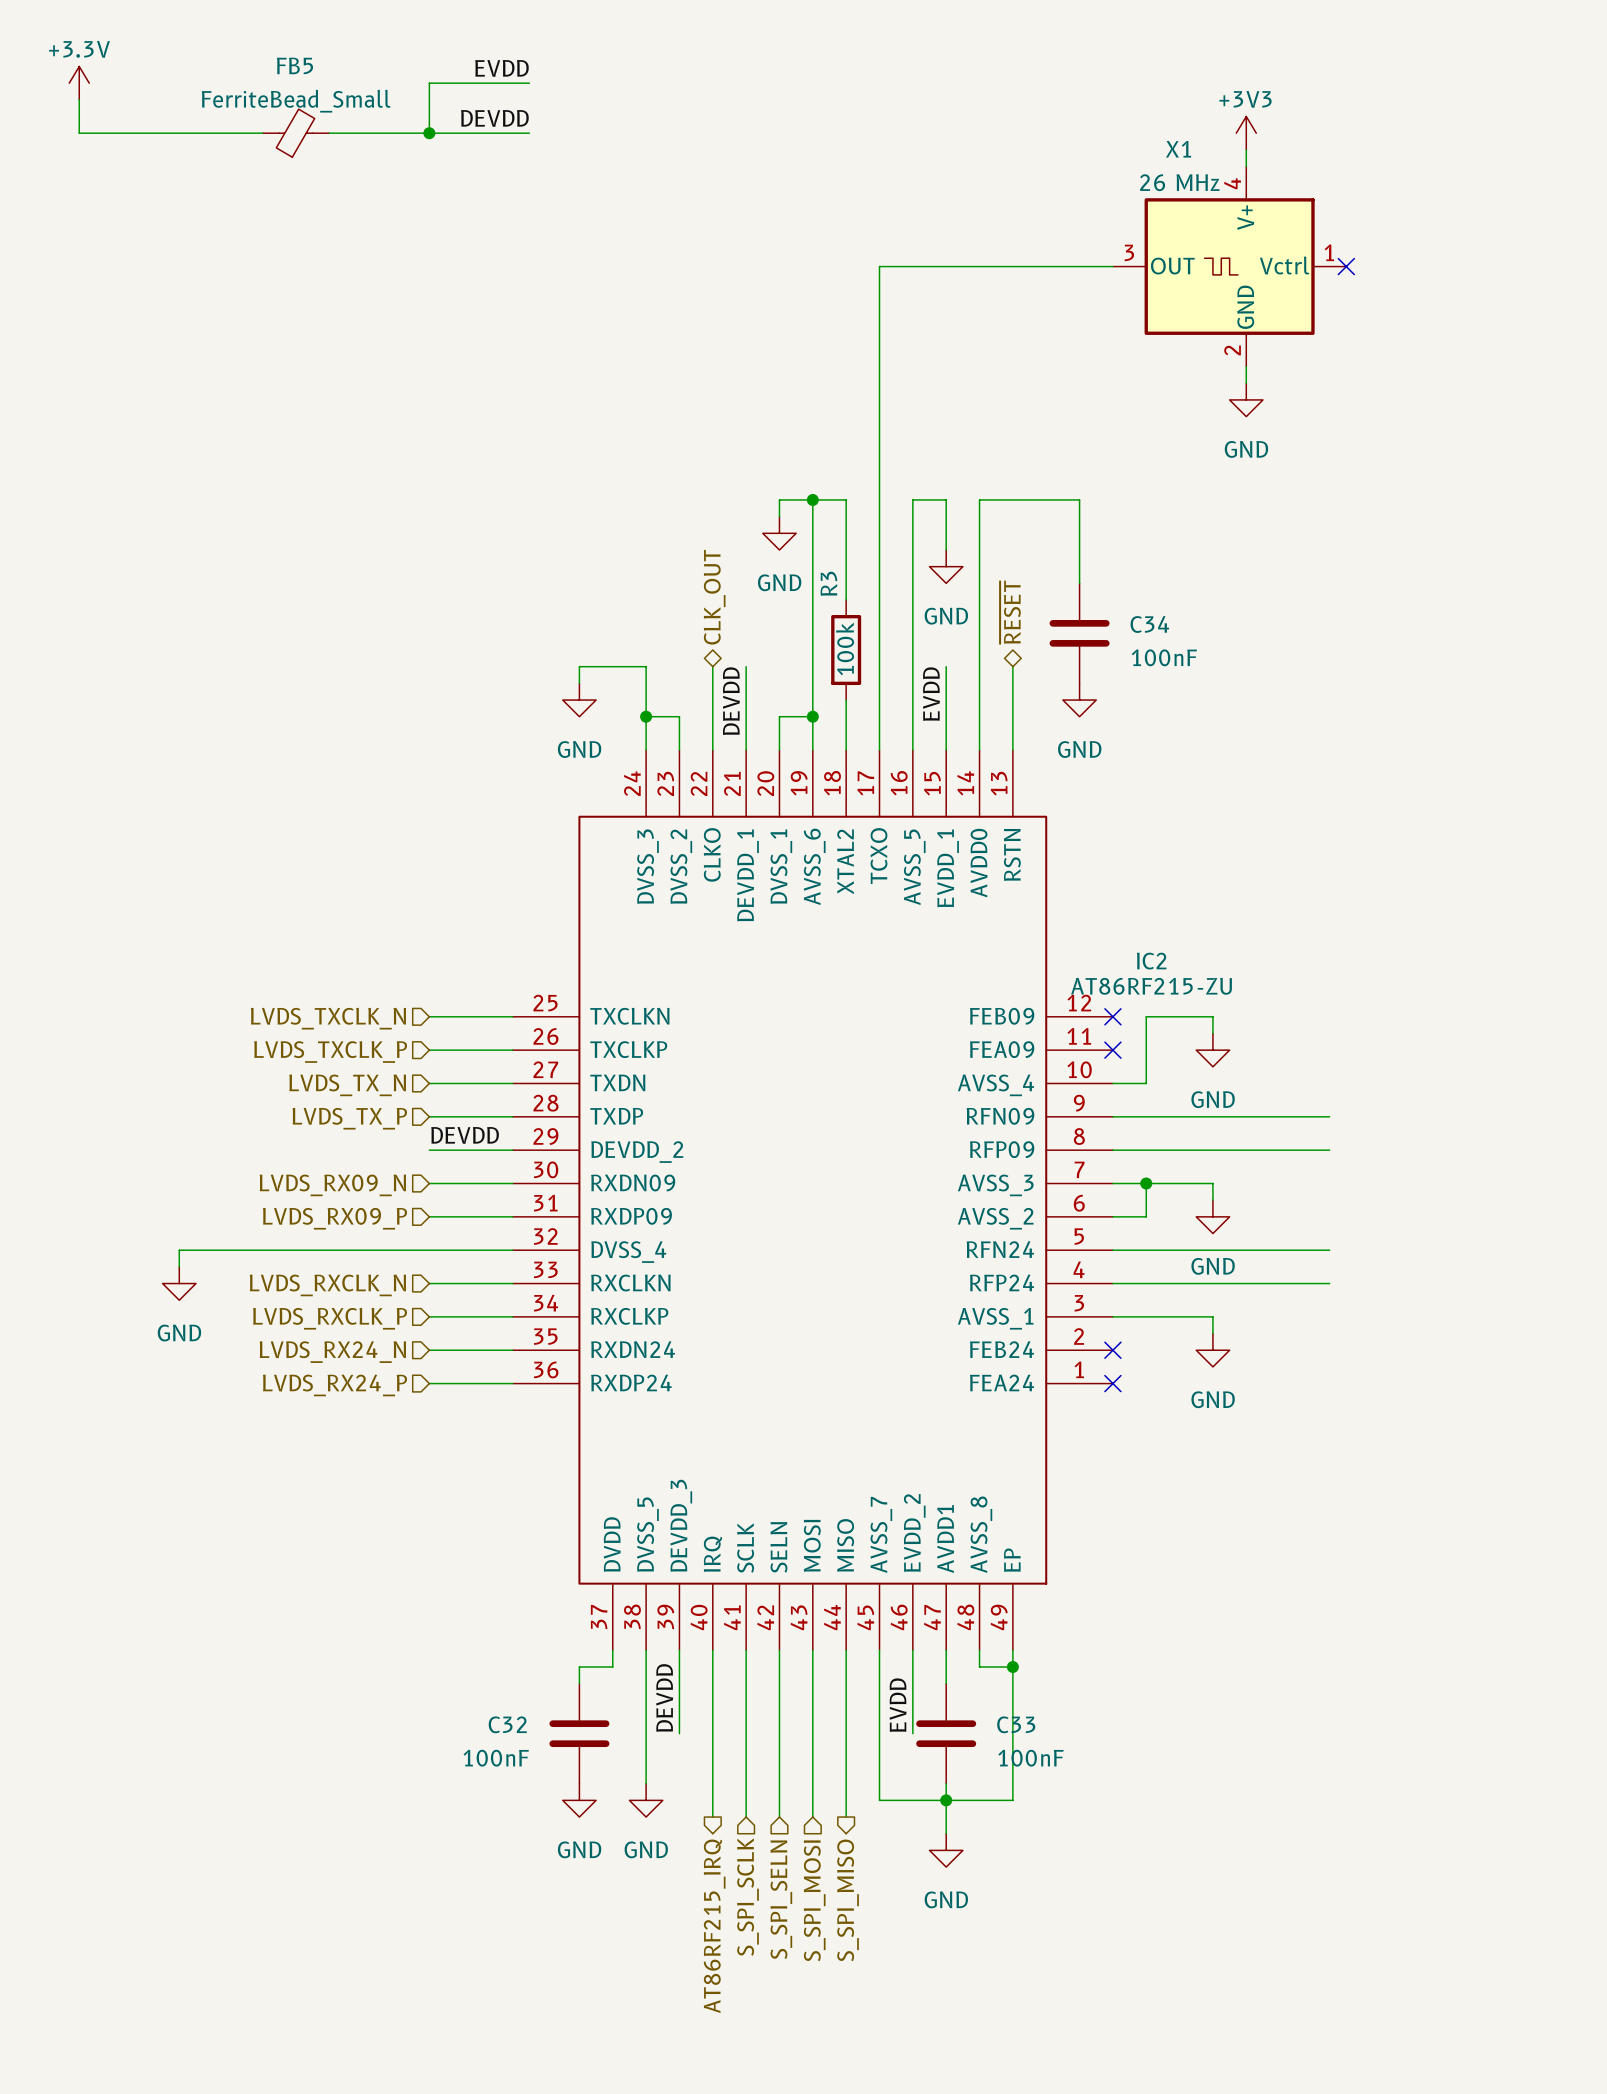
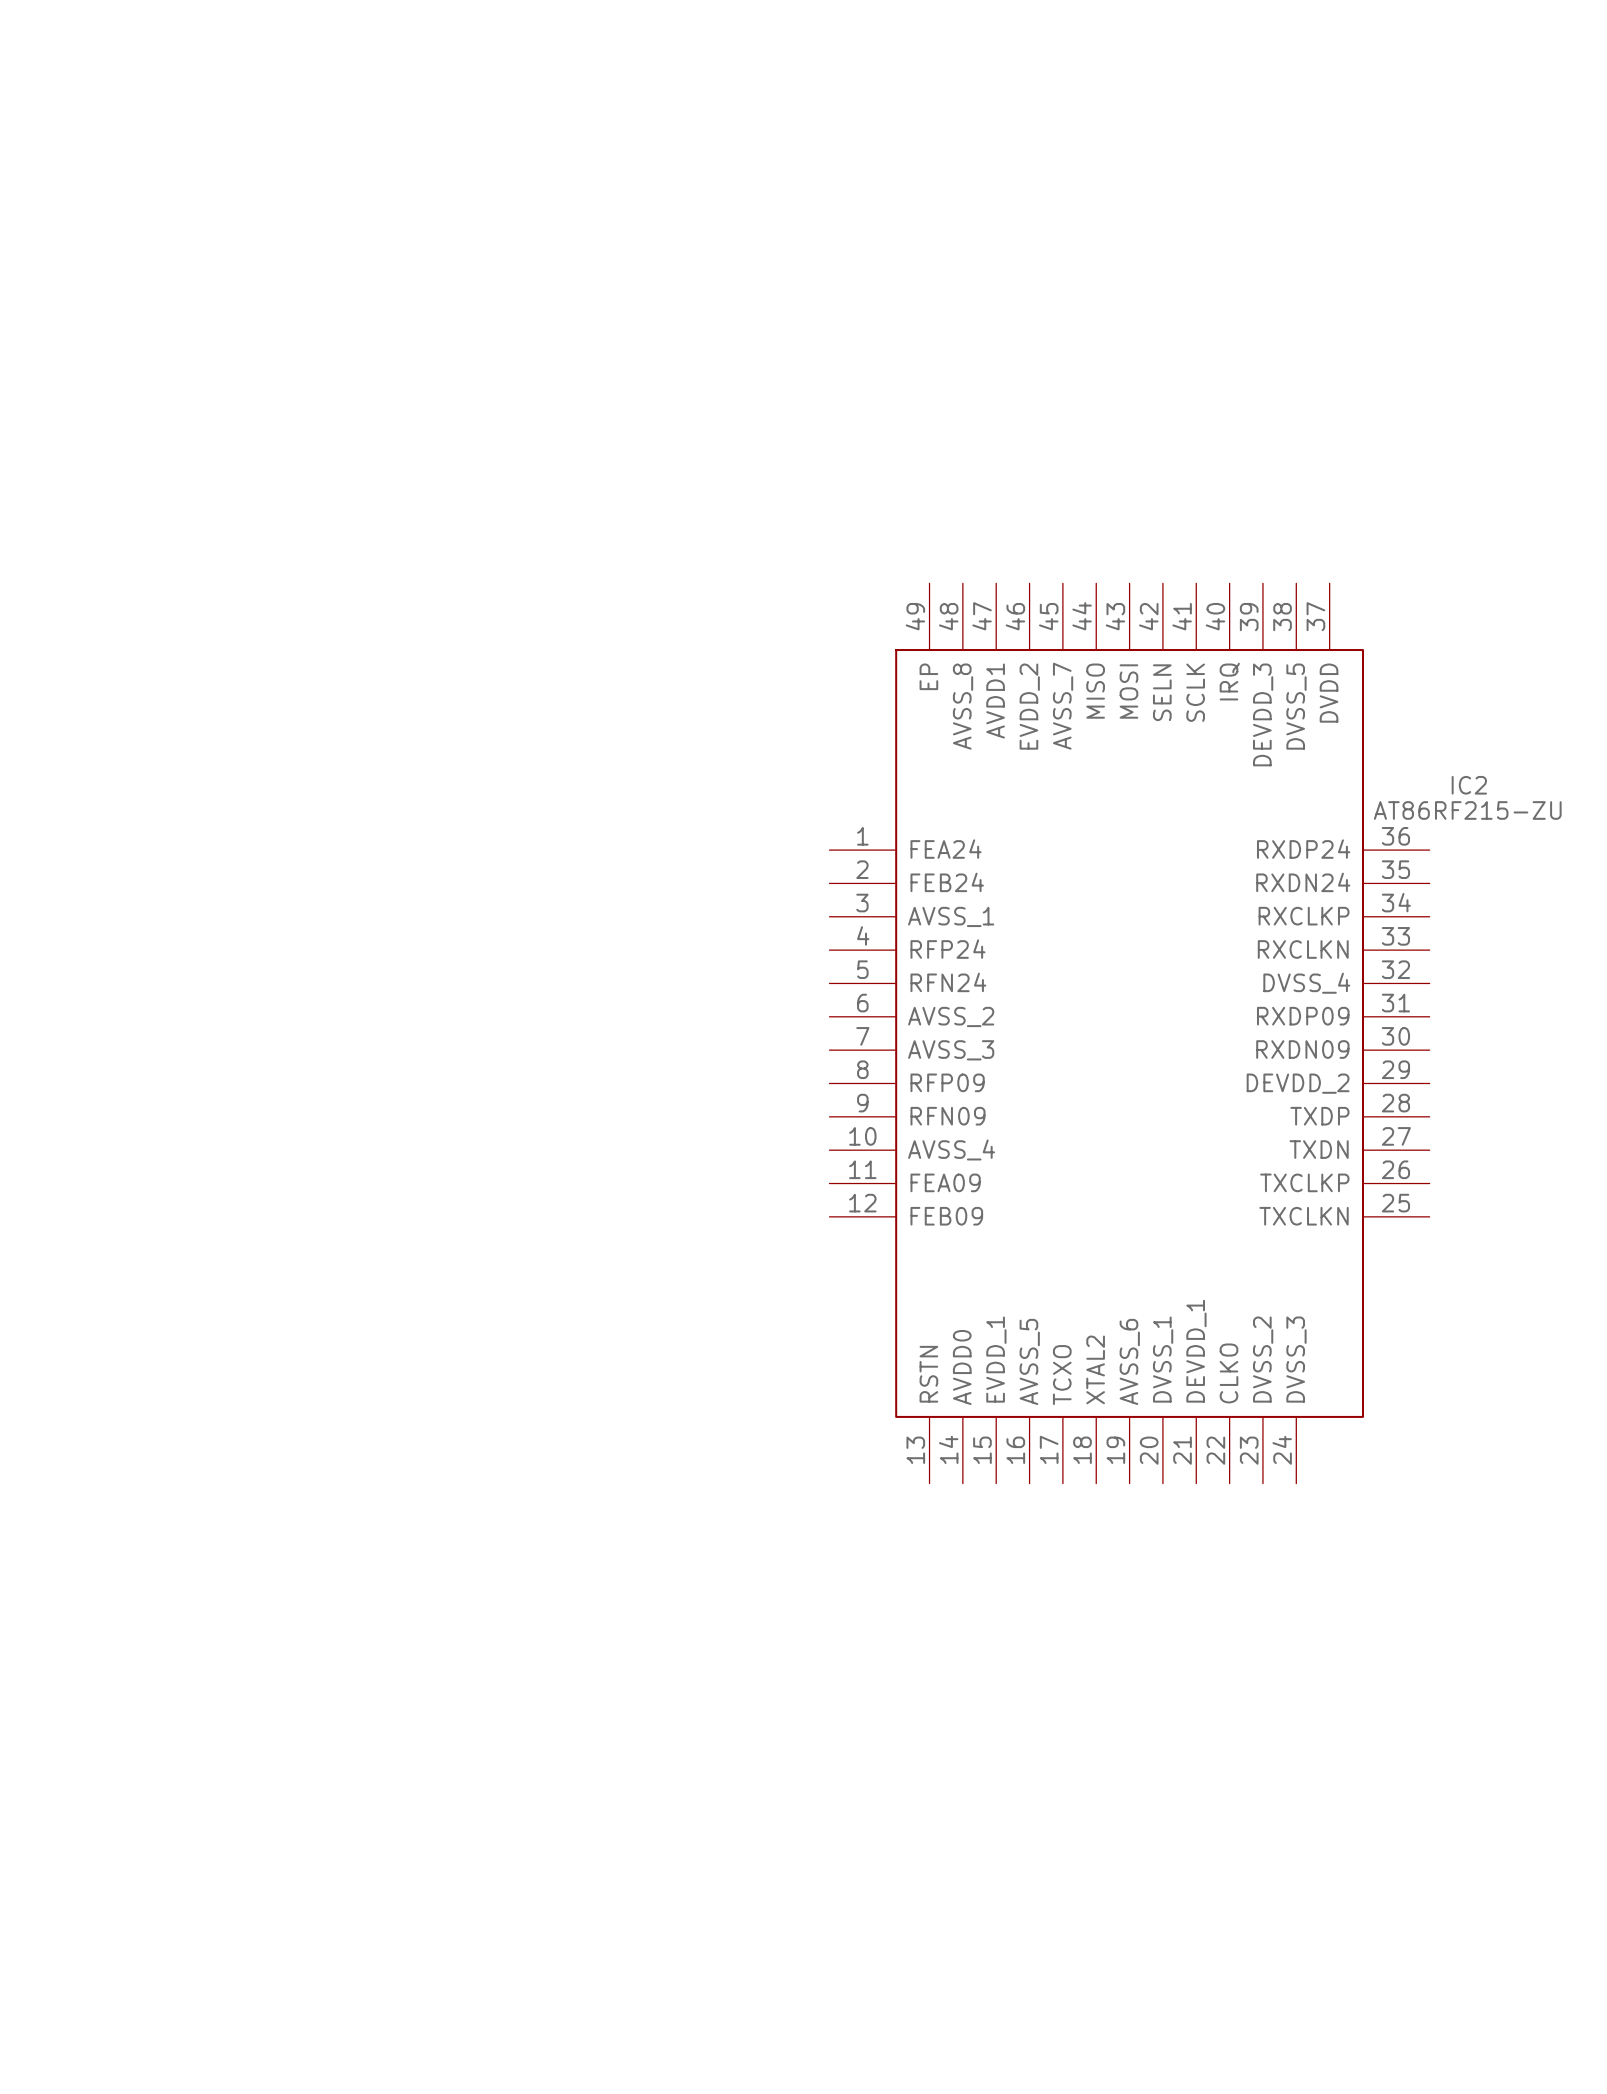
label: EVDD (501, 68) -> none
power symbol: +3.3V (79, 83) -> none
wire: (529, 83) (429, 83) (429, 133) -> none
wire: (79, 99) (79, 133) (262, 133) -> none
label: DEVDD (494, 118) -> none
FB5: FerriteBead_Small (295, 133) -> none
wire: (329, 133) (529, 133) -> none
junction: (429, 133) -> none
power symbol: +3V3 (1246, 133) -> none
wire: (1246, 149) (1246, 166) -> none
wire: (1112, 266) (879, 266) (879, 750) -> none
X1: 26 MHz (1229, 266) -> none
no-connect mark: (1346, 266) -> none
wire: (1246, 366) (1246, 383) -> none
power symbol: GND (1246, 399) -> none
wire: (812, 499) (812, 750) -> none
junction: (812, 499) -> none
wire: (779, 516) (779, 499) (846, 499) (846, 600) -> none
power symbol: GND (779, 533) -> none
wire: (946, 549) (946, 499) (912, 499) (912, 750) -> none
power symbol: GND (946, 566) -> none
wire: (1079, 583) (1079, 499) (979, 499) (979, 750) -> none
hierarchical label: CLK_OUT (714, 597) -> none
hierarchical label: ~{RESET} (1010, 612) -> none
C34: 100nF (1079, 633) -> none
R3: 100k (846, 650) -> none
wire: (712, 666) (712, 750) -> none
wire: (746, 666) (746, 750) -> none
wire: (946, 666) (946, 750) -> none
wire: (1012, 666) (1012, 750) -> none
wire: (579, 683) (579, 666) (646, 666) (646, 750) -> none
label: EVDD (931, 694) -> none
power symbol: GND (579, 700) -> none
wire: (846, 700) (846, 750) -> none
power symbol: GND (1079, 700) -> none
label: DEVDD (731, 701) -> none
wire: (646, 716) (679, 716) (679, 750) -> none
junction: (646, 716) -> none
wire: (812, 716) (779, 716) (779, 750) -> none
junction: (812, 716) -> none
wire: (429, 1016) (512, 1016) -> none
no-connect mark: (1112, 1016) -> none
hierarchical label: LVDS_TXCLK_N (328, 1018) -> none
wire: (1212, 1033) (1212, 1016) (1146, 1016) (1146, 1083) (1112, 1083) -> none
wire: (429, 1050) (512, 1050) -> none
no-connect mark: (1112, 1050) -> none
power symbol: GND (1212, 1050) -> none
hierarchical label: LVDS_TXCLK_P (330, 1052) -> none
wire: (429, 1083) (512, 1083) -> none
hierarchical label: LVDS_TX_N (347, 1085) -> none
wire: (429, 1116) (512, 1116) -> none
wire: (1112, 1116) (1329, 1116) -> none
hierarchical label: LVDS_TX_P (349, 1118) -> none
label: DEVDD (465, 1135) -> none
wire: (429, 1150) (512, 1150) -> none
wire: (1112, 1150) (1329, 1150) -> none
wire: (429, 1183) (512, 1183) -> none
wire: (1112, 1183) (1212, 1183) (1212, 1200) -> none
wire: (1146, 1183) (1146, 1216) (1112, 1216) -> none
junction: (1146, 1183) -> none
hierarchical label: LVDS_RX09_N (332, 1185) -> none
IC2 rotation: 0° (812, 1200) -> 180° (1129, 1033)
wire: (429, 1216) (512, 1216) -> none
power symbol: GND (1212, 1216) -> none
hierarchical label: LVDS_RX09_P (334, 1218) -> none
wire: (512, 1250) (179, 1250) (179, 1266) -> none
wire: (1112, 1250) (1329, 1250) -> none
power symbol: GND (179, 1283) -> none
wire: (429, 1283) (512, 1283) -> none
wire: (1112, 1283) (1329, 1283) -> none
hierarchical label: LVDS_RXCLK_N (327, 1285) -> none
wire: (429, 1316) (512, 1316) -> none
wire: (1112, 1316) (1212, 1316) (1212, 1333) -> none
hierarchical label: LVDS_RXCLK_P (330, 1318) -> none
wire: (429, 1350) (512, 1350) -> none
no-connect mark: (1112, 1350) -> none
power symbol: GND (1212, 1350) -> none
hierarchical label: LVDS_RX24_N (332, 1352) -> none
wire: (429, 1383) (512, 1383) -> none
no-connect mark: (1112, 1383) -> none
hierarchical label: LVDS_RX24_P (334, 1385) -> none
wire: (612, 1650) (612, 1667) (579, 1667) (579, 1683) -> none
wire: (646, 1650) (646, 1783) -> none
wire: (679, 1650) (679, 1733) -> none
wire: (712, 1650) (712, 1817) -> none
wire: (746, 1650) (746, 1817) -> none
wire: (779, 1650) (779, 1817) -> none
wire: (812, 1650) (812, 1817) -> none
wire: (846, 1650) (846, 1817) -> none
wire: (879, 1650) (879, 1800) (1012, 1800) (1012, 1650) -> none
wire: (912, 1650) (912, 1733) -> none
wire: (946, 1650) (946, 1683) -> none
wire: (979, 1650) (979, 1667) (1012, 1667) -> none
junction: (1012, 1667) -> none
label: DEVDD (664, 1697) -> none
label: EVDD (898, 1705) -> none
C32: 100nF (579, 1733) -> none
C33: 100nF (946, 1733) -> none
wire: (946, 1783) (946, 1833) -> none
power symbol: GND (579, 1800) -> none
power symbol: GND (646, 1800) -> none
junction: (946, 1800) -> none
power symbol: GND (946, 1850) -> none
hierarchical label: S_SPI_SCLK (748, 1897) -> none
hierarchical label: S_SPI_SELN (781, 1899) -> none
hierarchical label: S_SPI_MOSI (814, 1900) -> none
hierarchical label: S_SPI_MISO (848, 1900) -> none
hierarchical label: AT86RF215_IRQ (714, 1926) -> none

